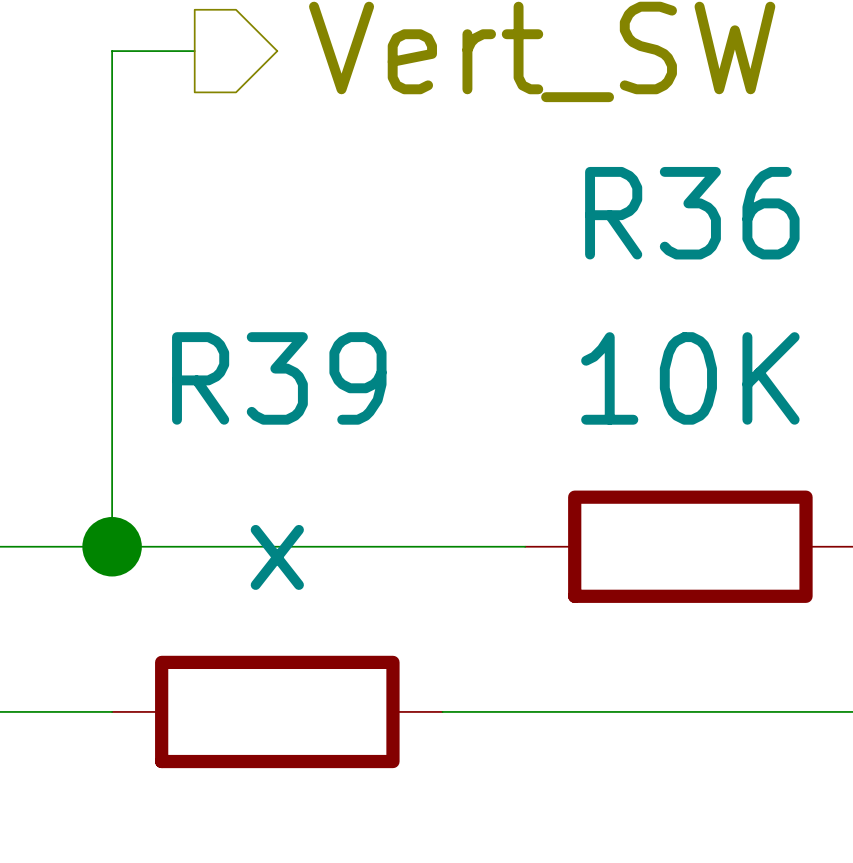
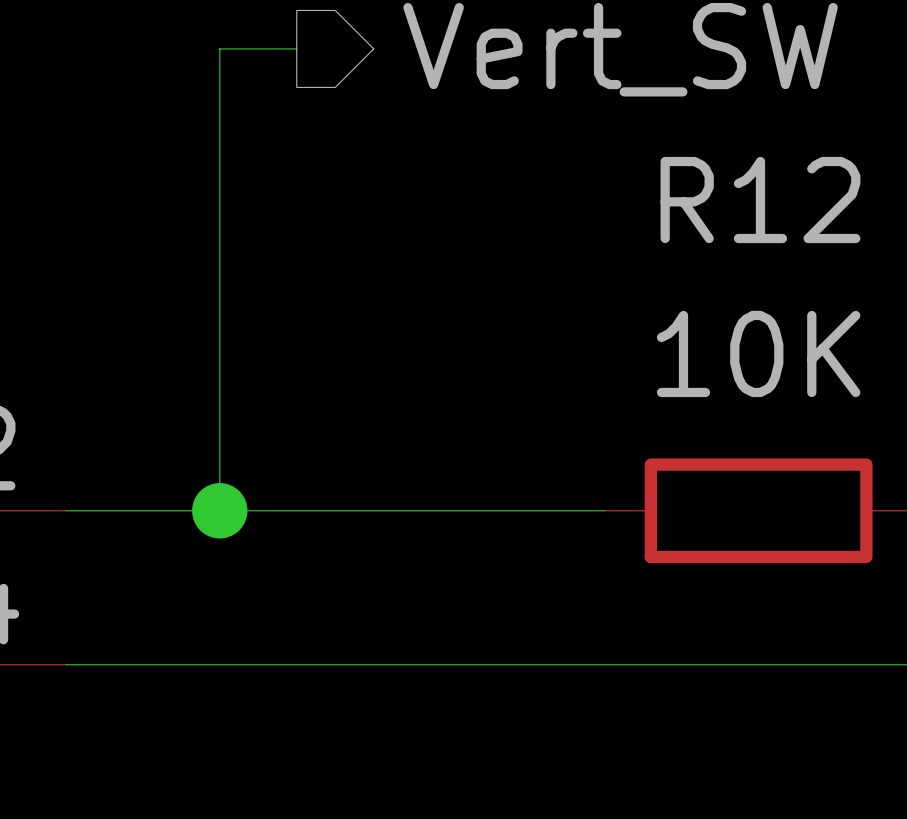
R36 name: R36 (692, 213) -> R12 (760, 200)
wire: none -> (219, 664) (527, 664)
R39: x (277, 711) -> none

